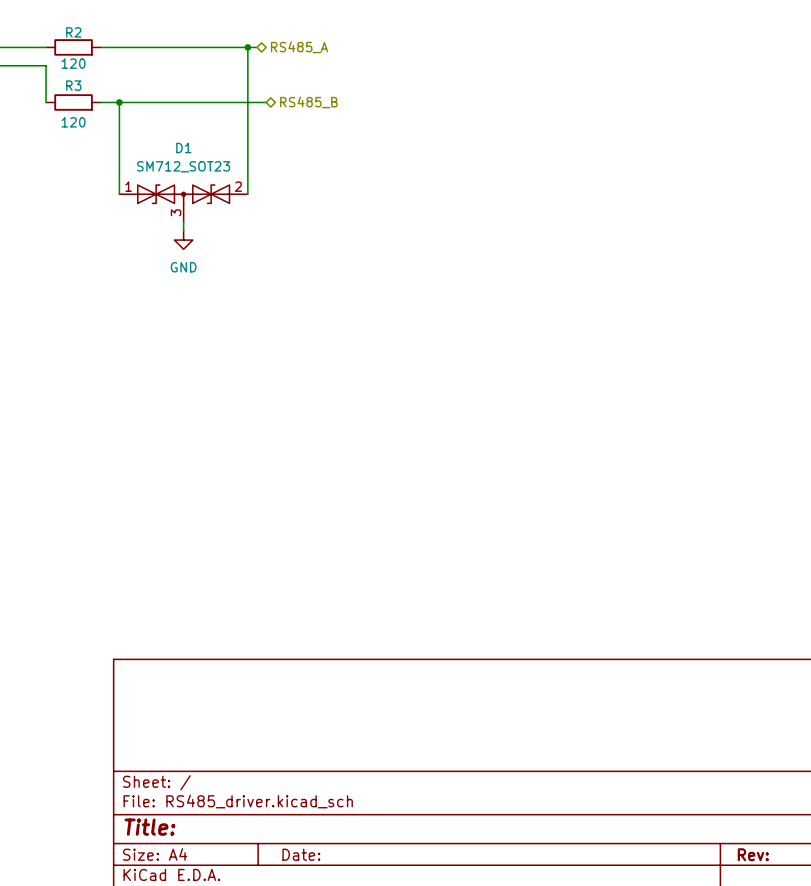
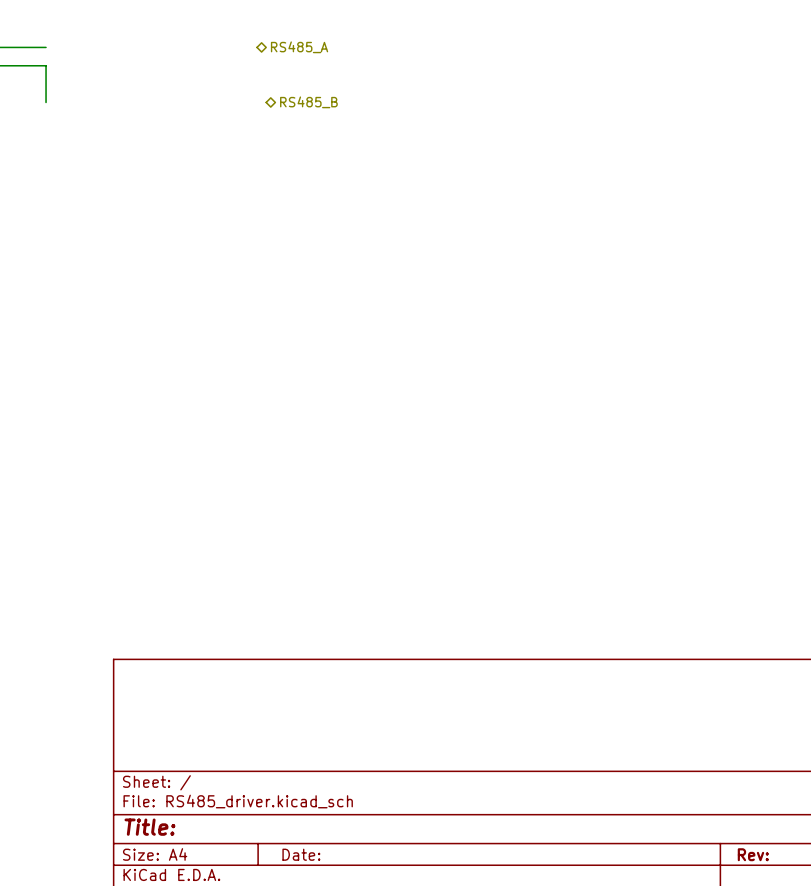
R2: 120 (73, 47) -> none
wire: (101, 47) (257, 47) -> none
wire: (247, 47) (247, 194) -> none
junction: (247, 47) -> none
R3: 120 (73, 102) -> none
wire: (101, 102) (266, 102) -> none
wire: (119, 102) (119, 194) -> none
junction: (119, 102) -> none
D1: SM712_SOT23 (183, 203) -> none
wire: (183, 221) (183, 230) -> none
power symbol: GND (183, 240) -> none

